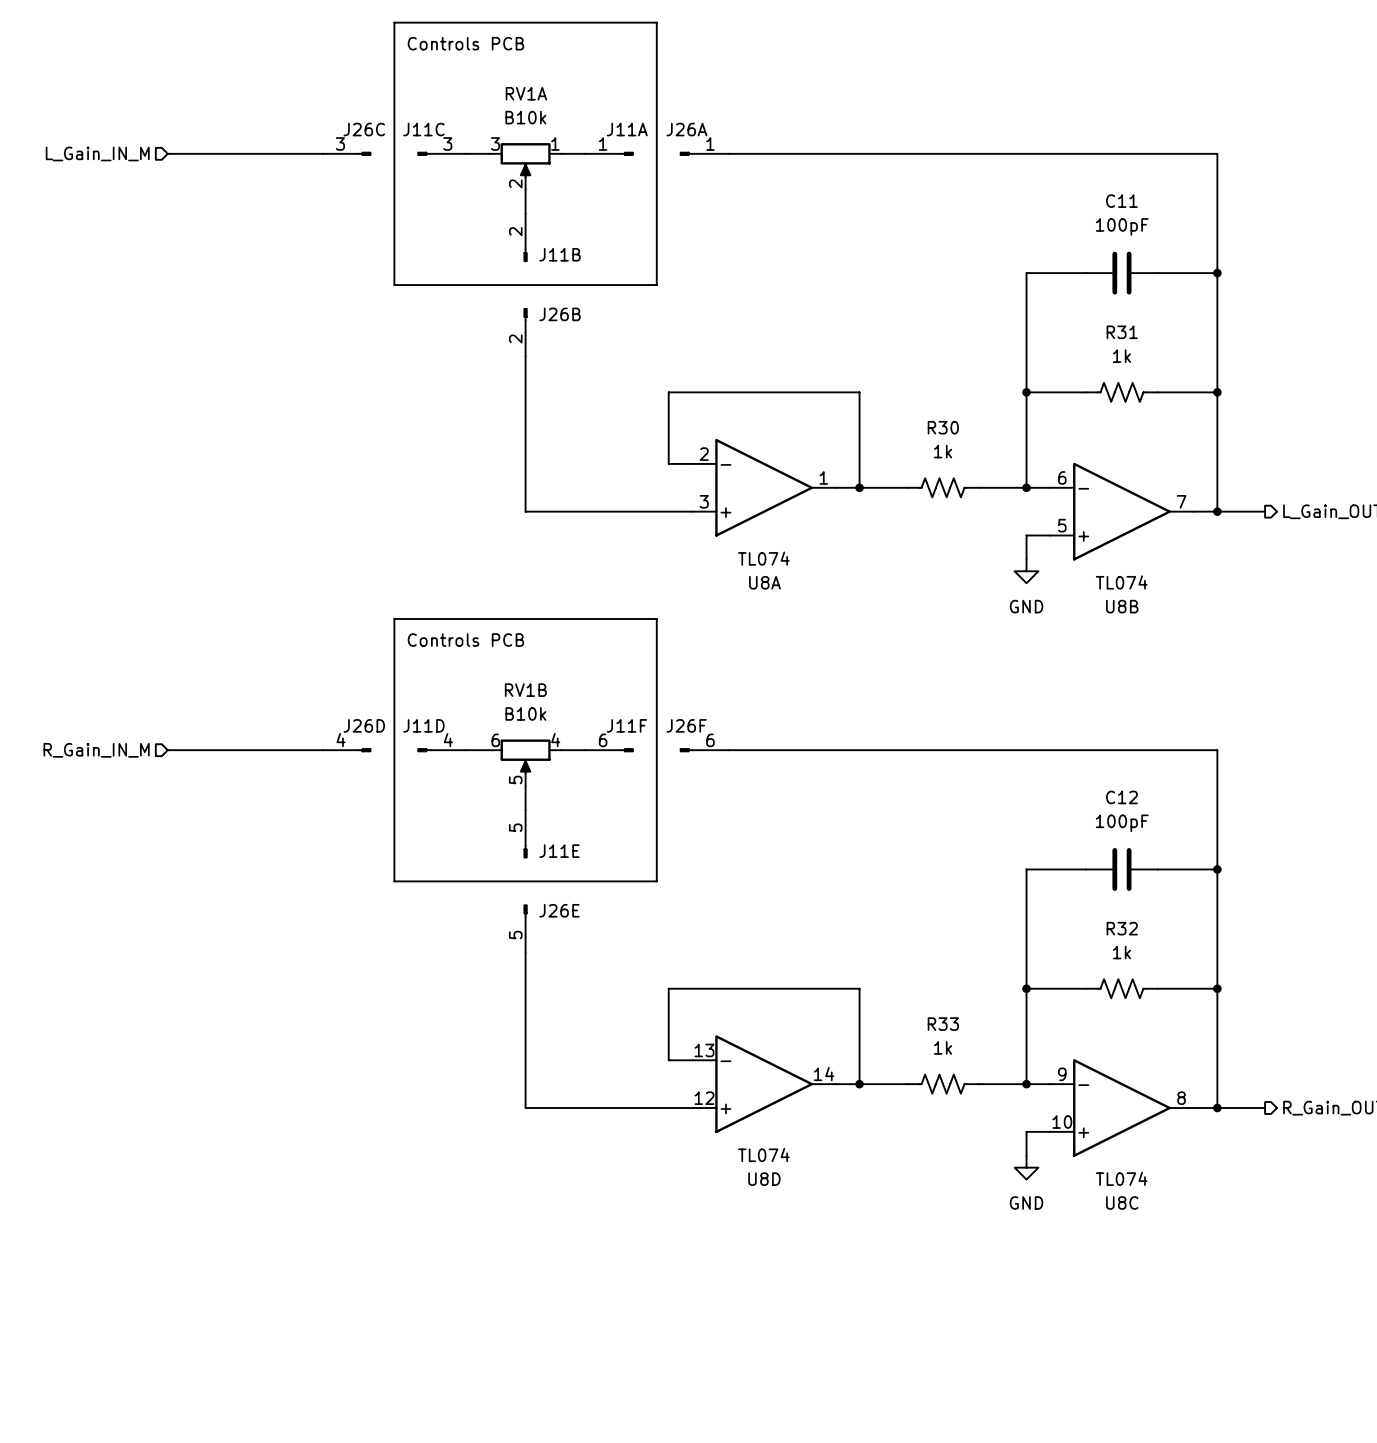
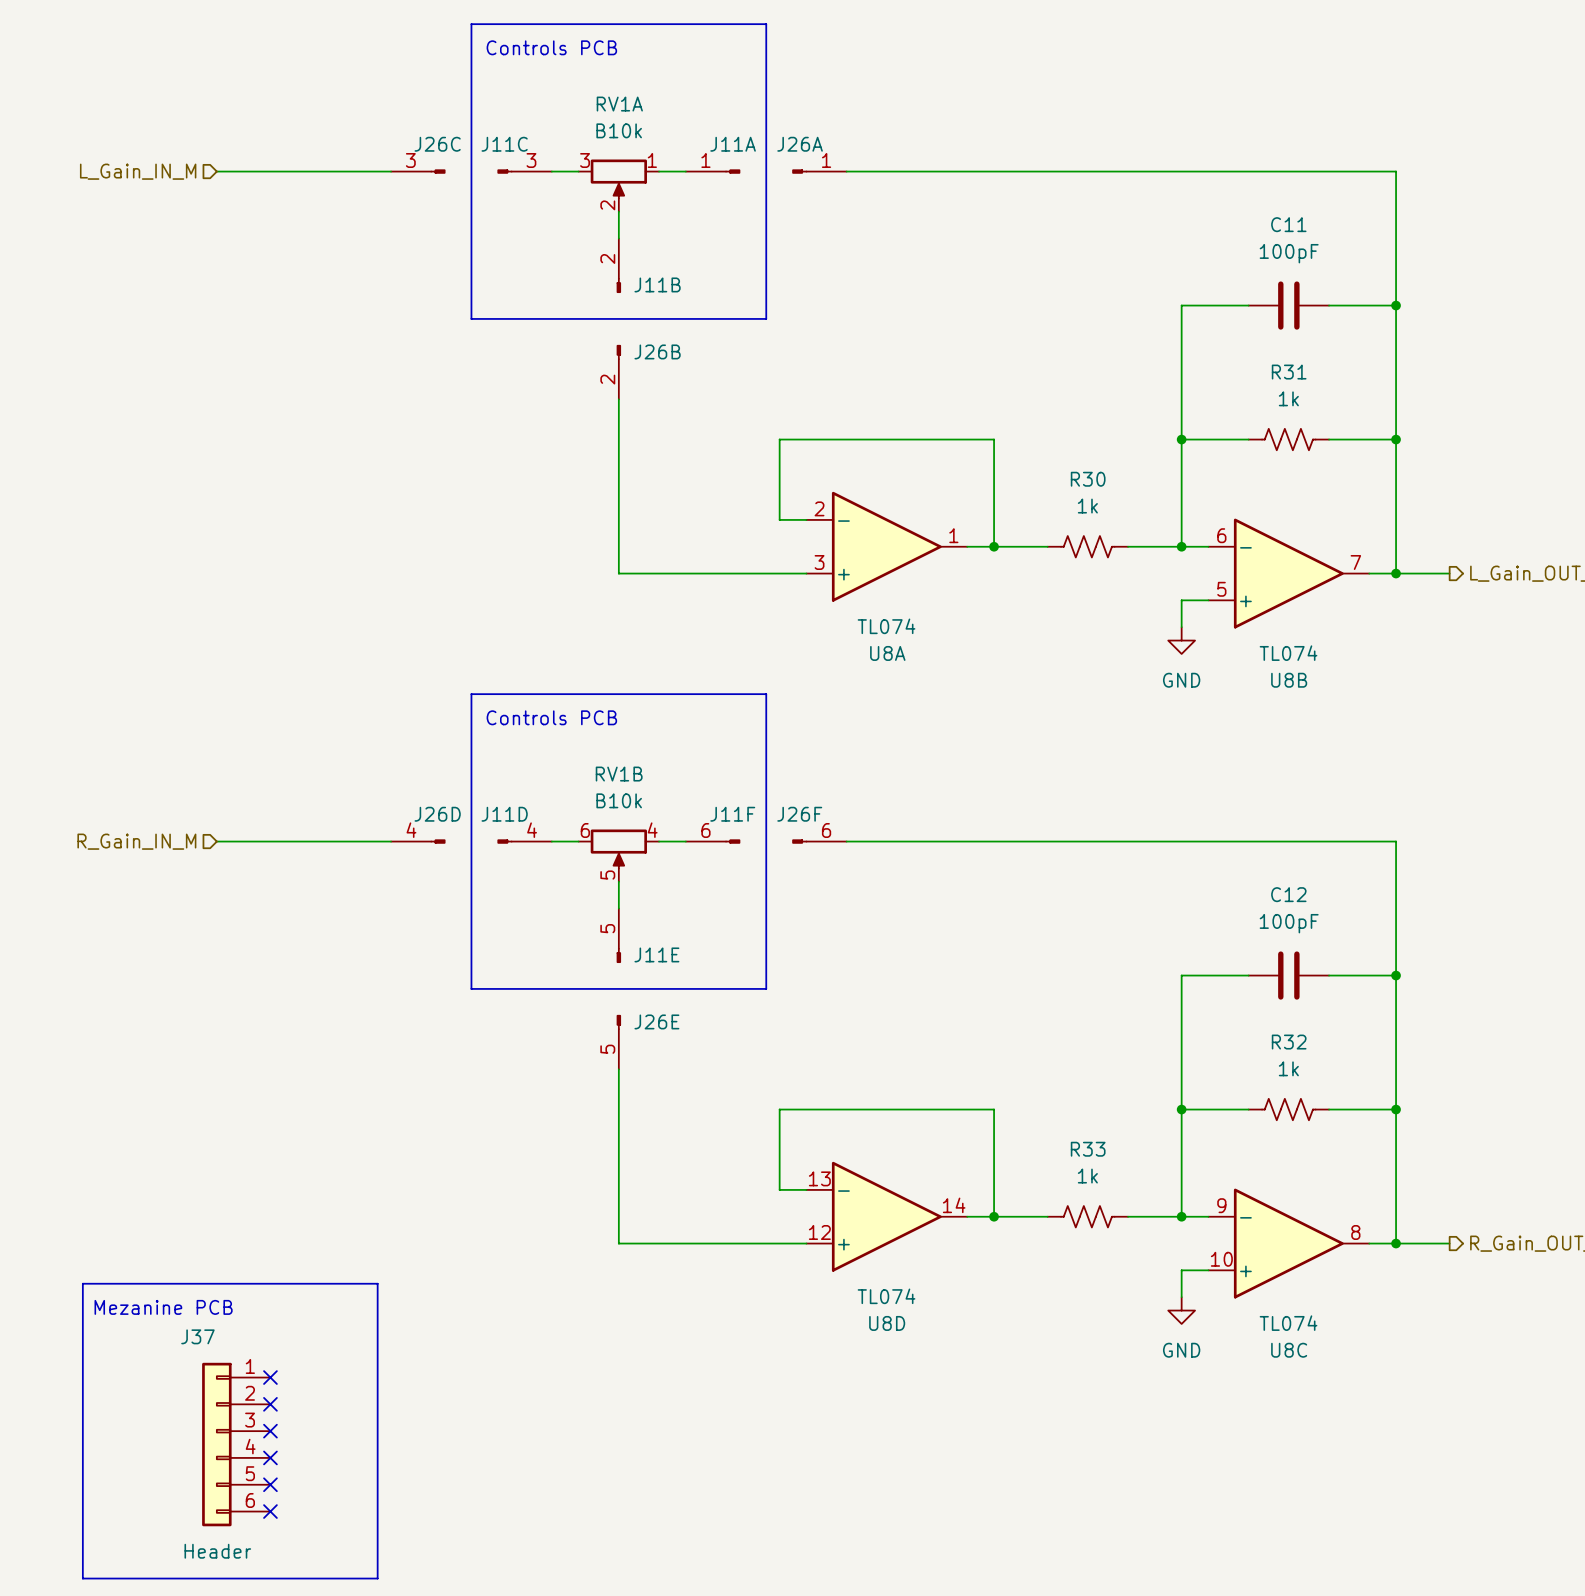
line: none -> (82, 1283) (377, 1283) (377, 1578) (82, 1578) (82, 1283)
text: none -> Mezanine PCB (163, 1307)
no-connect mark: none -> (270, 1377)
no-connect mark: none -> (270, 1404)
no-connect mark: none -> (270, 1431)
J37: none -> (236, 1444)
no-connect mark: none -> (270, 1457)
no-connect mark: none -> (270, 1484)
no-connect mark: none -> (270, 1511)

